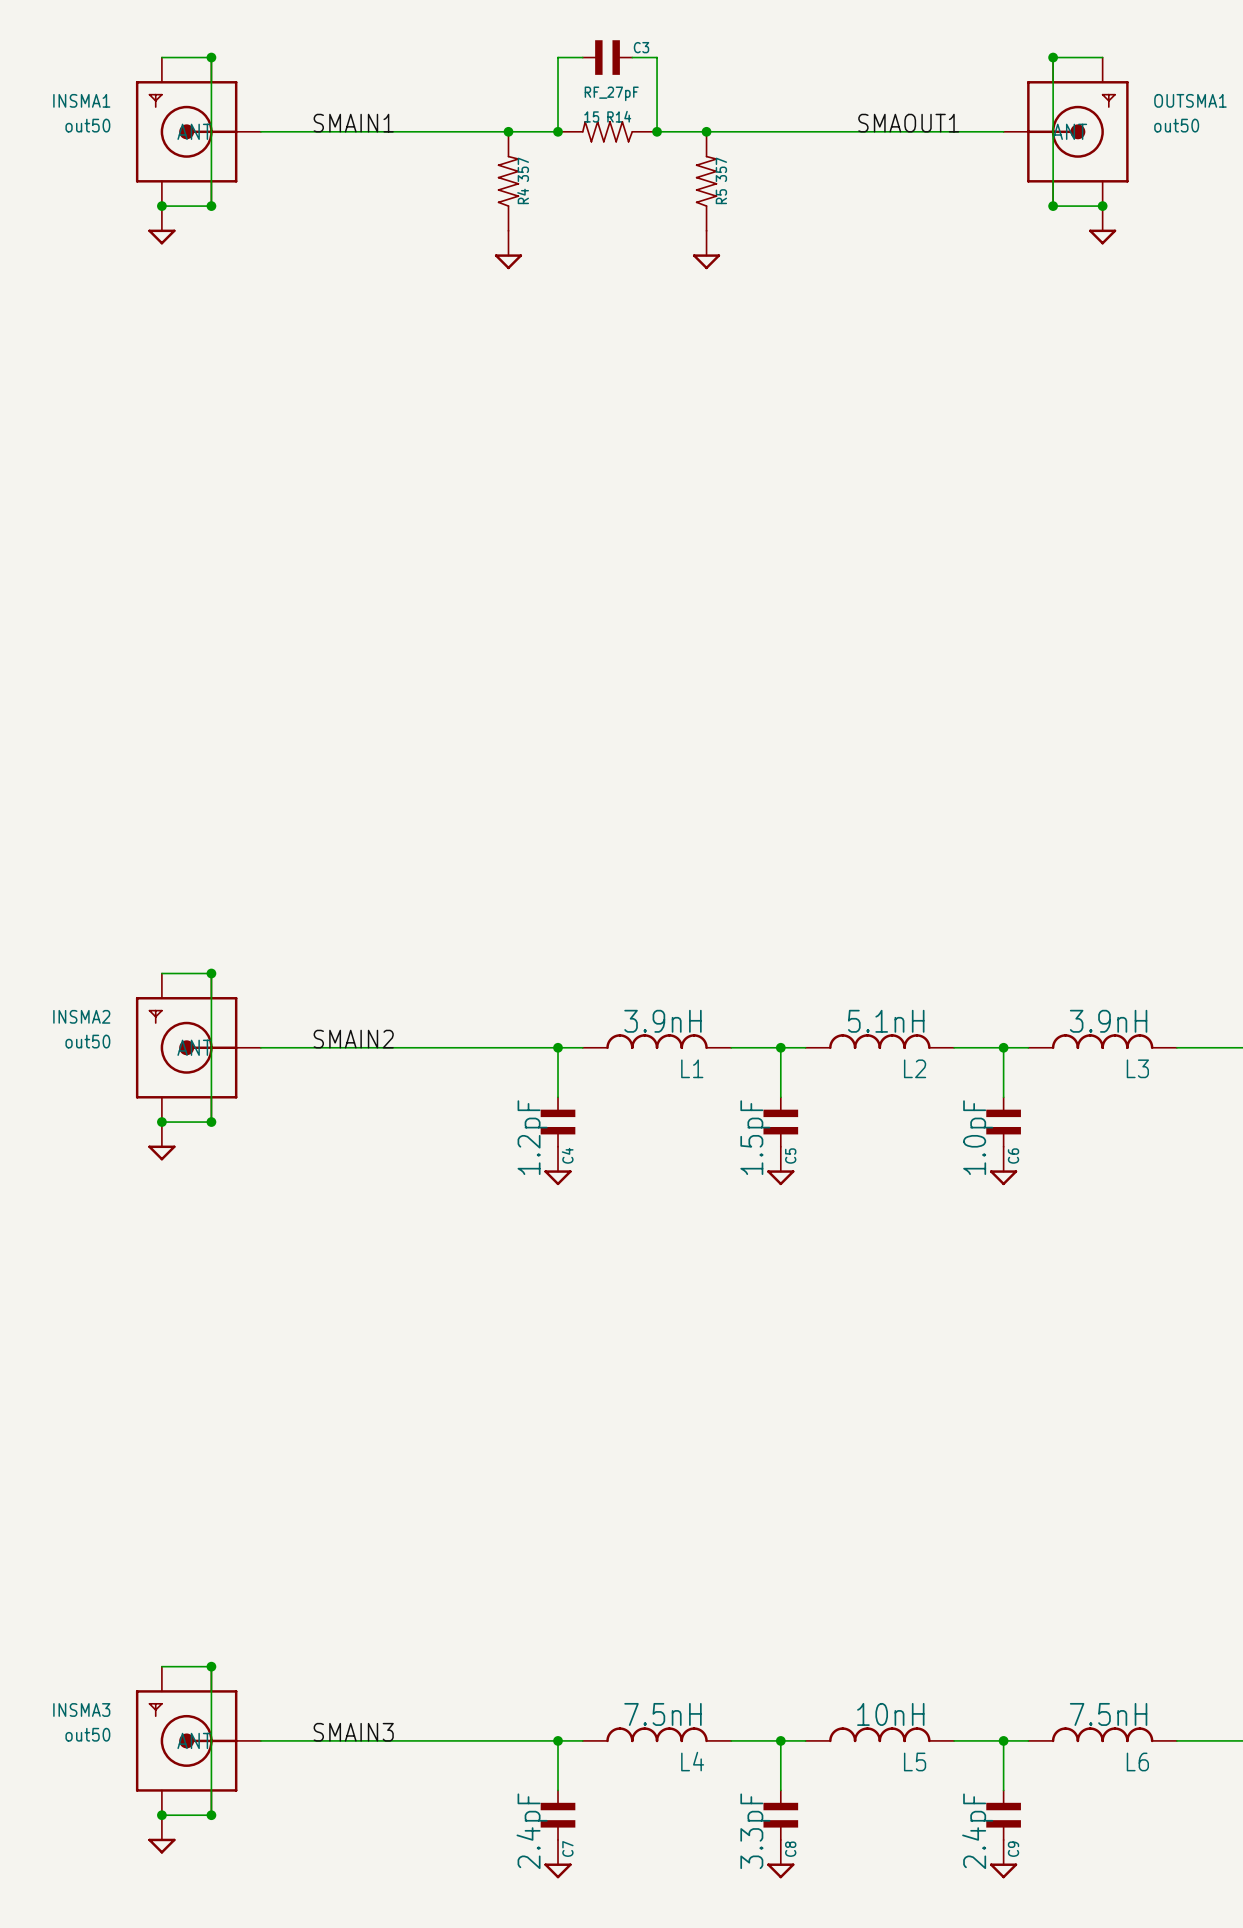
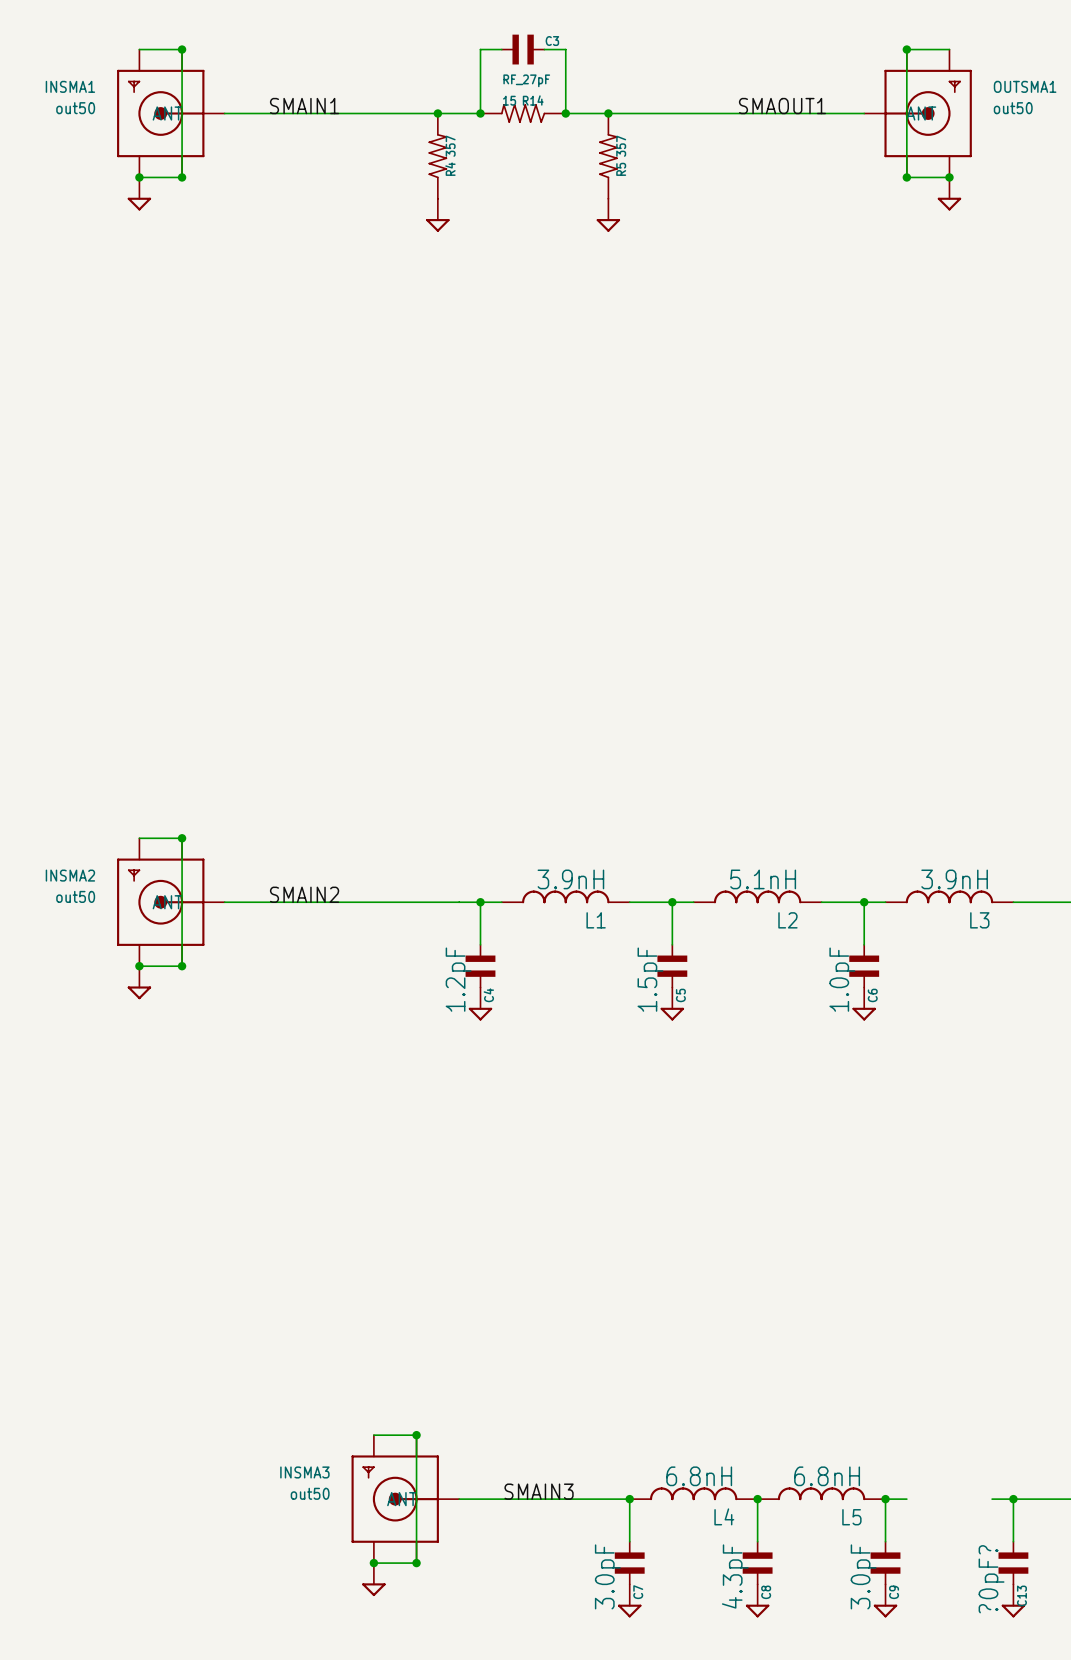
wire: (161, 1666) (211, 1666) (211, 1815) (161, 1815) -> none
junction: (211, 1666) -> none
wire: none -> (373, 1435) (416, 1435) (416, 1563) (373, 1563)
junction: none -> (416, 1435)
L4 value: 7.5nH (662, 1714) -> 6.8nH (699, 1476)
L5 value: 10nH (890, 1714) -> 6.8nH (827, 1476)
label: SMAIN3 (353, 1732) -> none
label: none -> SMAIN3 (539, 1491)
L4 position: (657, 1734) -> (693, 1493)
L5 position: (879, 1734) -> (821, 1493)
L6: 7.5nH (1102, 1734) -> none
INSMA3 position: (198, 1740) -> (405, 1499)
wire: (260, 1740) (533, 1740) -> none
wire: (558, 1740) (558, 1790) -> none
junction: (558, 1740) -> none
wire: none -> (501, 1499) (629, 1499) (629, 1541)
wire: (731, 1740) (805, 1740) -> none
junction: none -> (629, 1499)
wire: (780, 1740) (780, 1790) -> (757, 1499) (757, 1541)
junction: (780, 1740) -> none
junction: none -> (757, 1499)
wire: (954, 1740) (1028, 1740) -> none
wire: (1003, 1740) (1003, 1790) -> none
junction position: (1003, 1740) -> (885, 1499)
wire: none -> (906, 1499) (885, 1499) (885, 1541)
wire: none -> (992, 1499) (1013, 1499) (1013, 1541)
junction: none -> (1013, 1499)
junction: (161, 1815) -> none
junction: (211, 1815) -> none
junction: none -> (373, 1563)
junction: none -> (416, 1563)
C7 position: (558, 1815) -> (629, 1563)
C8 position: (780, 1815) -> (757, 1563)
C9 position: (1003, 1815) -> (885, 1563)
C13: none -> ?0pF? (1013, 1563)
C7 value: 2.4pF (532, 1831) -> 3.0pF (607, 1576)
C8 value: 3.3pF (755, 1831) -> 4.3pF (735, 1576)
C9 value: 2.4pF (977, 1831) -> 3.0pF (863, 1576)
power symbol: (161, 1834) -> none
power symbol: none -> (373, 1579)
power symbol: (558, 1859) -> none
power symbol: none -> (629, 1600)
power symbol: (780, 1859) -> none
power symbol: none -> (757, 1600)
power symbol position: (1003, 1859) -> (885, 1600)
power symbol: none -> (1013, 1600)

